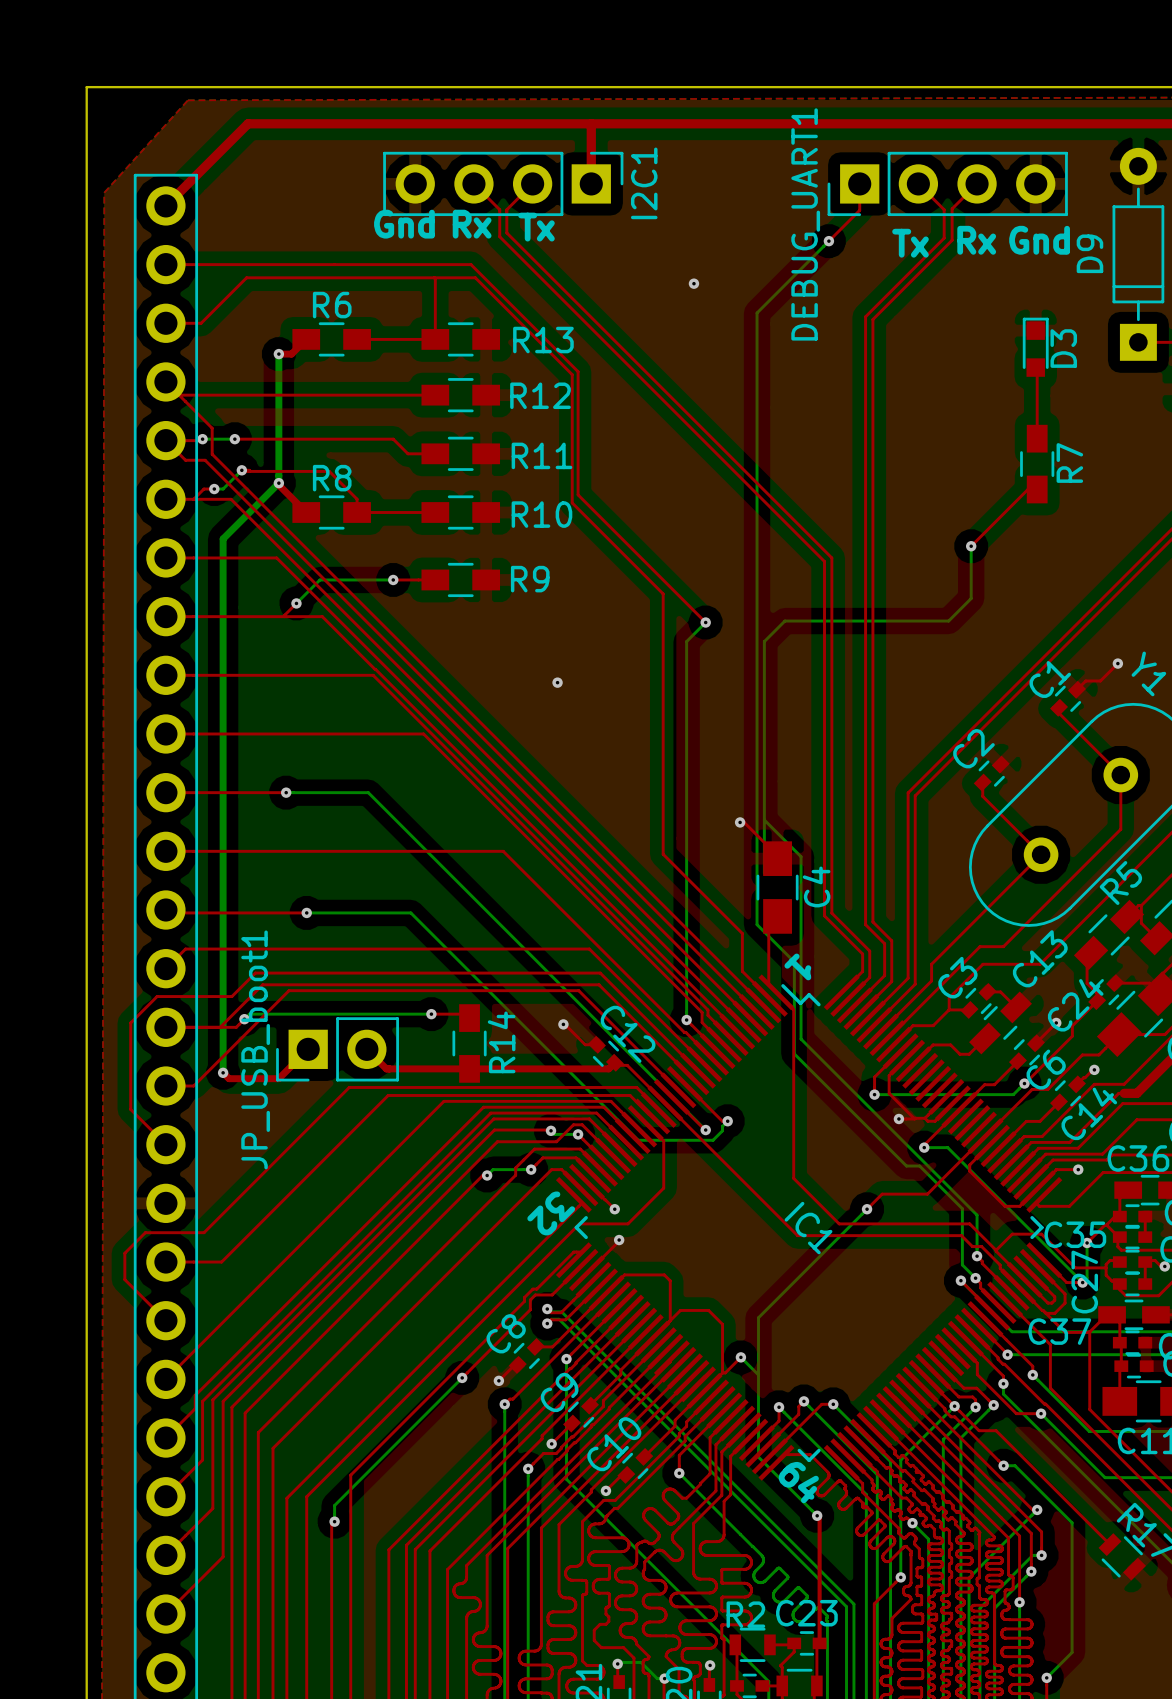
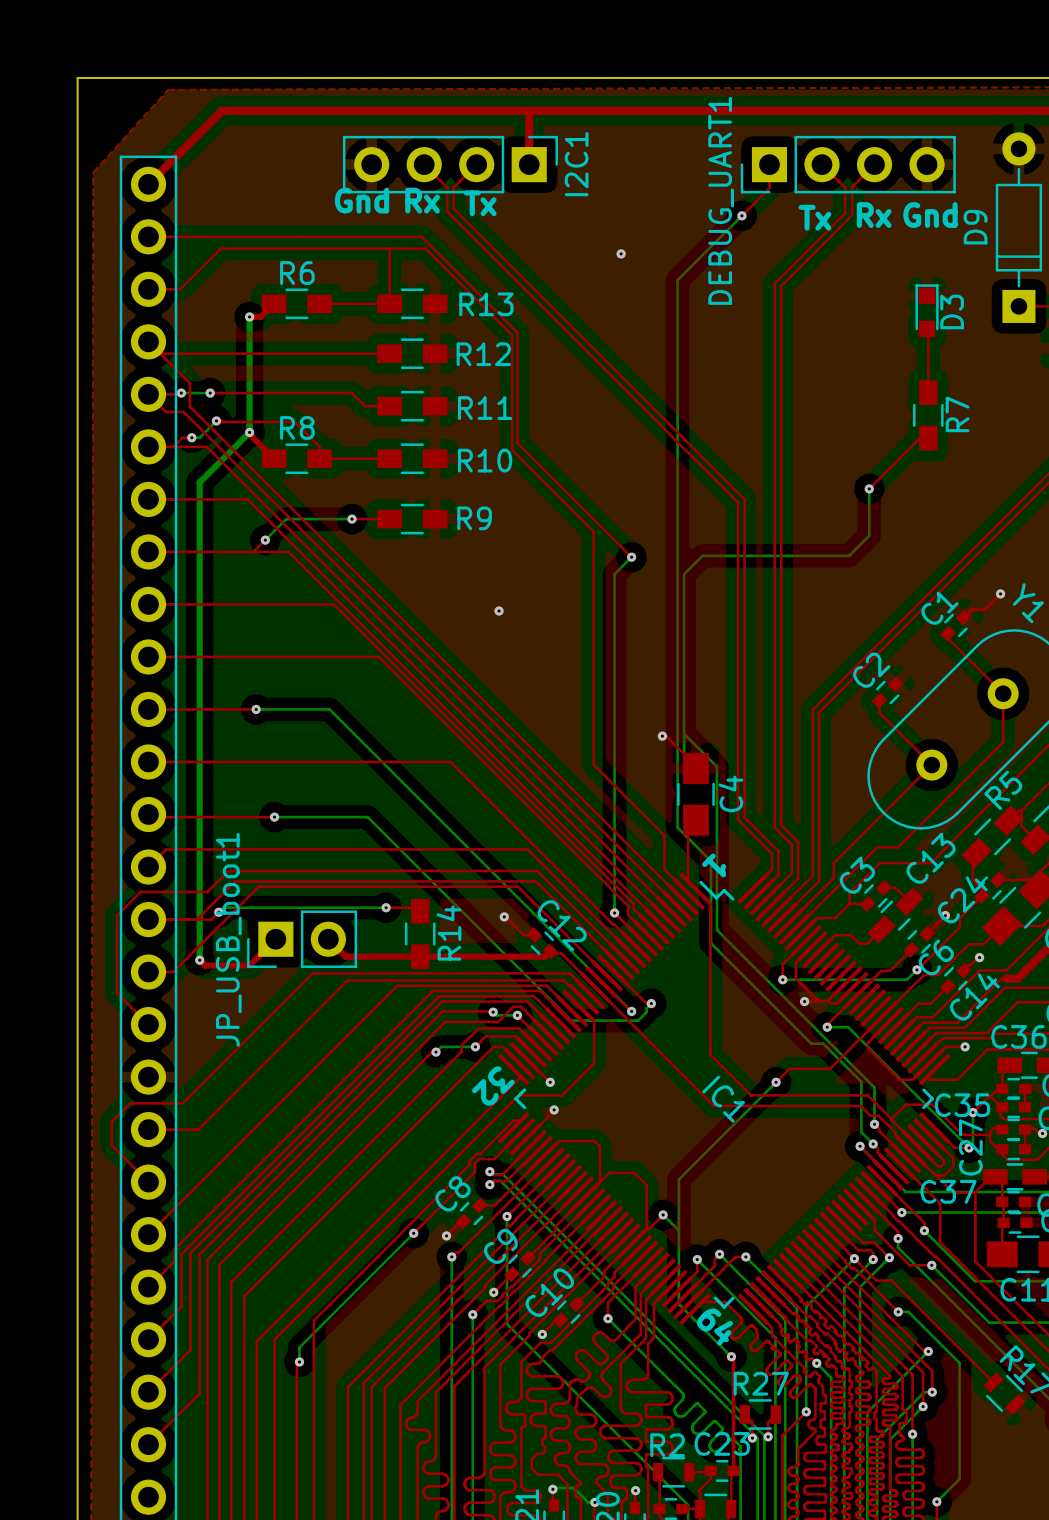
top track: none -> (744, 1414) (752, 1422) (752, 1438)
R27: none -> (760, 1414)
top track: none -> (775, 1414) (768, 1422) (768, 1436)
via: none -> (768, 1436)
via: none -> (752, 1438)

